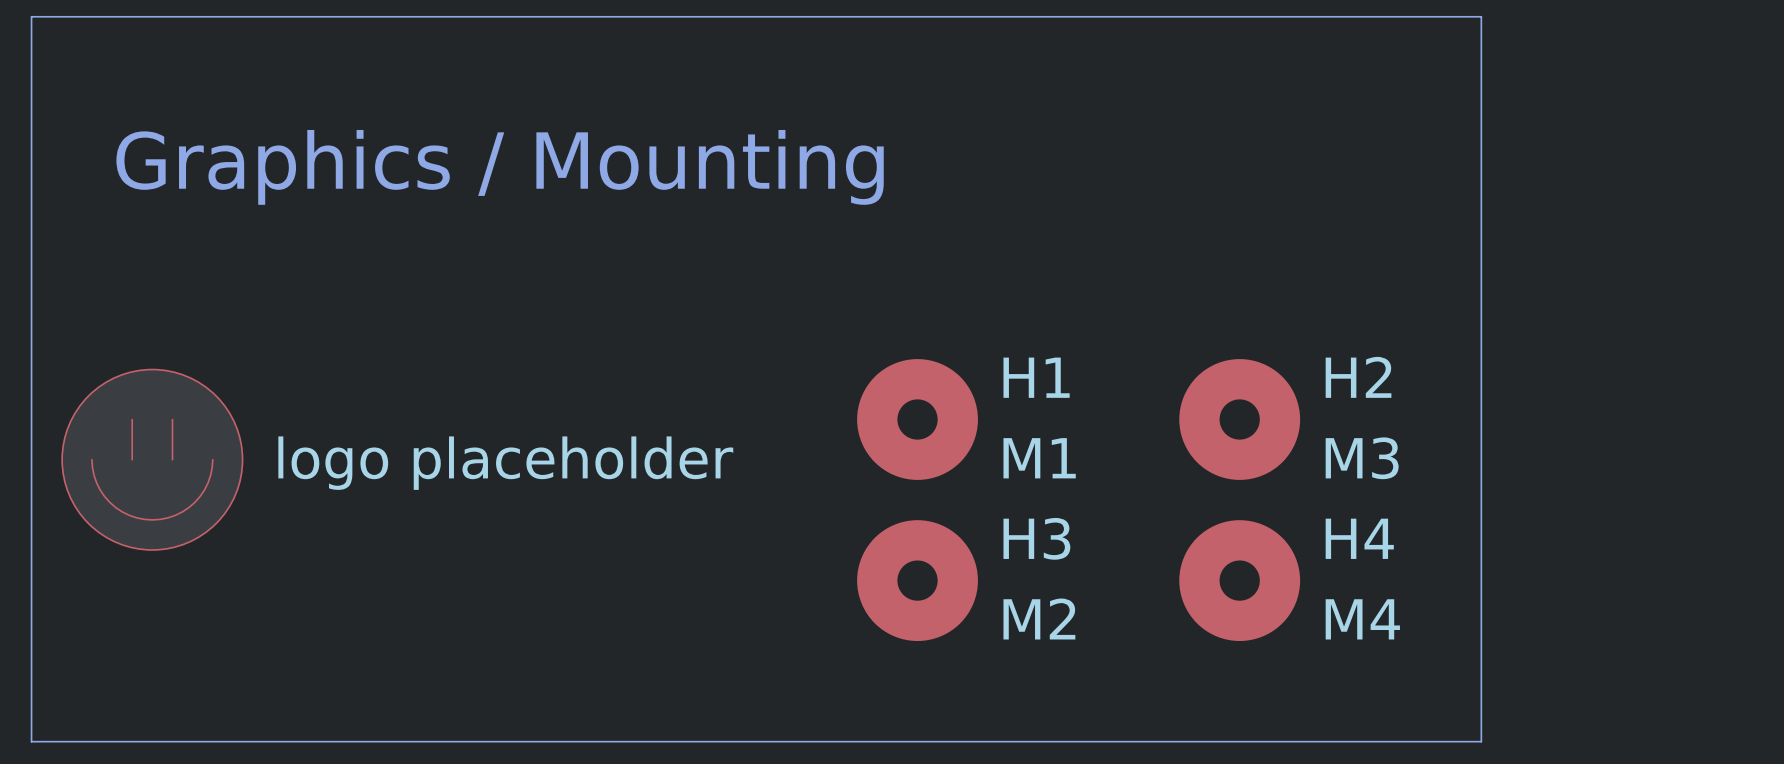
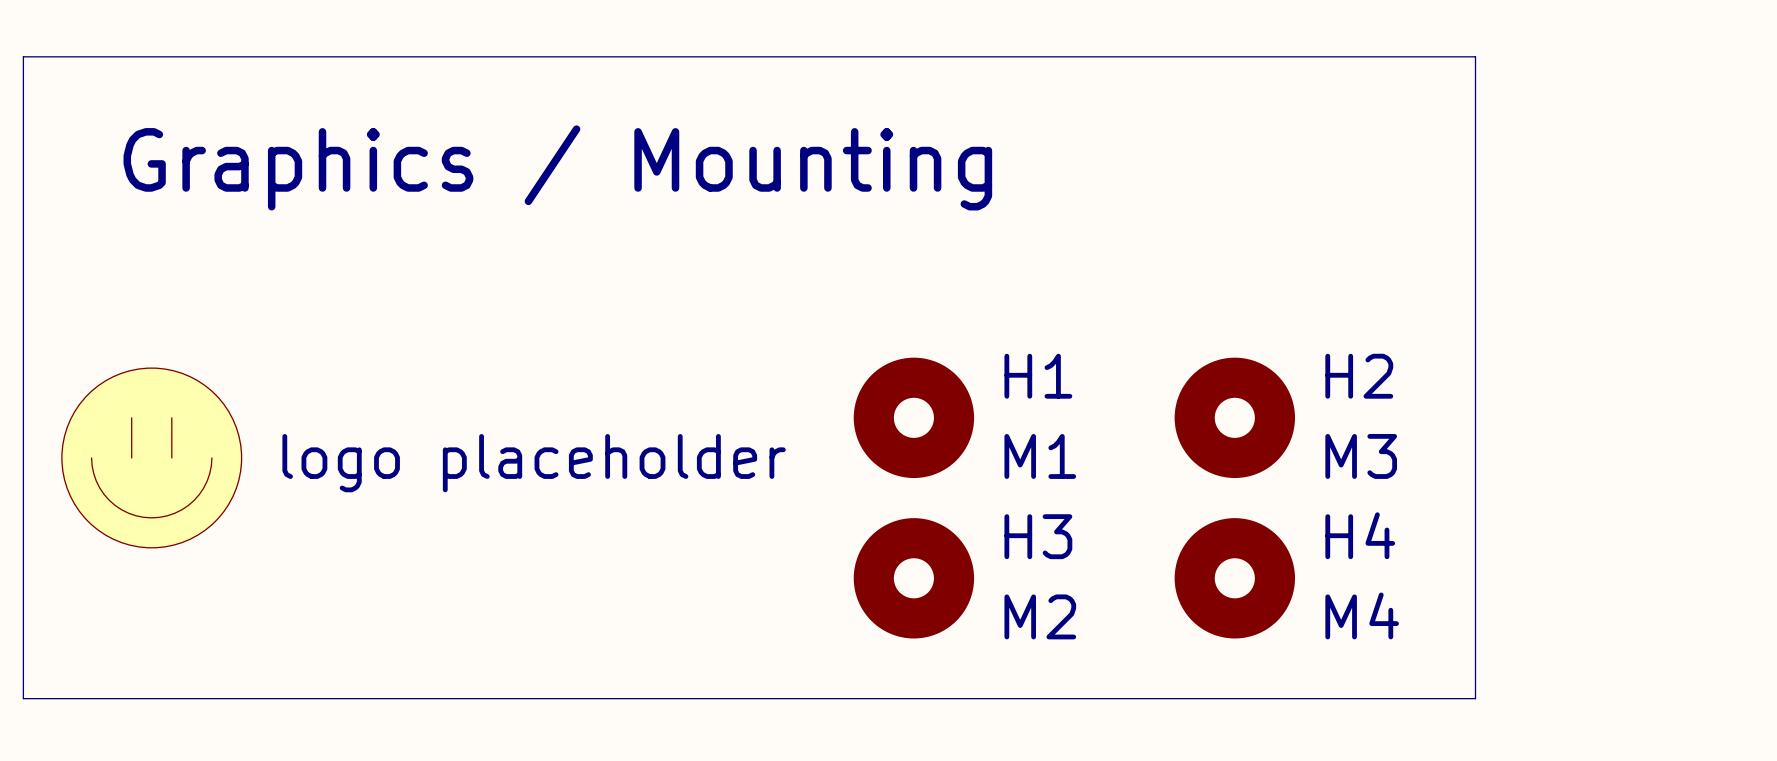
line: (1481, 57) (1481, 16) (31, 16) (31, 741) (1481, 741) (1481, 701) -> (1475, 56) (23, 56) (23, 698) (1475, 698)

